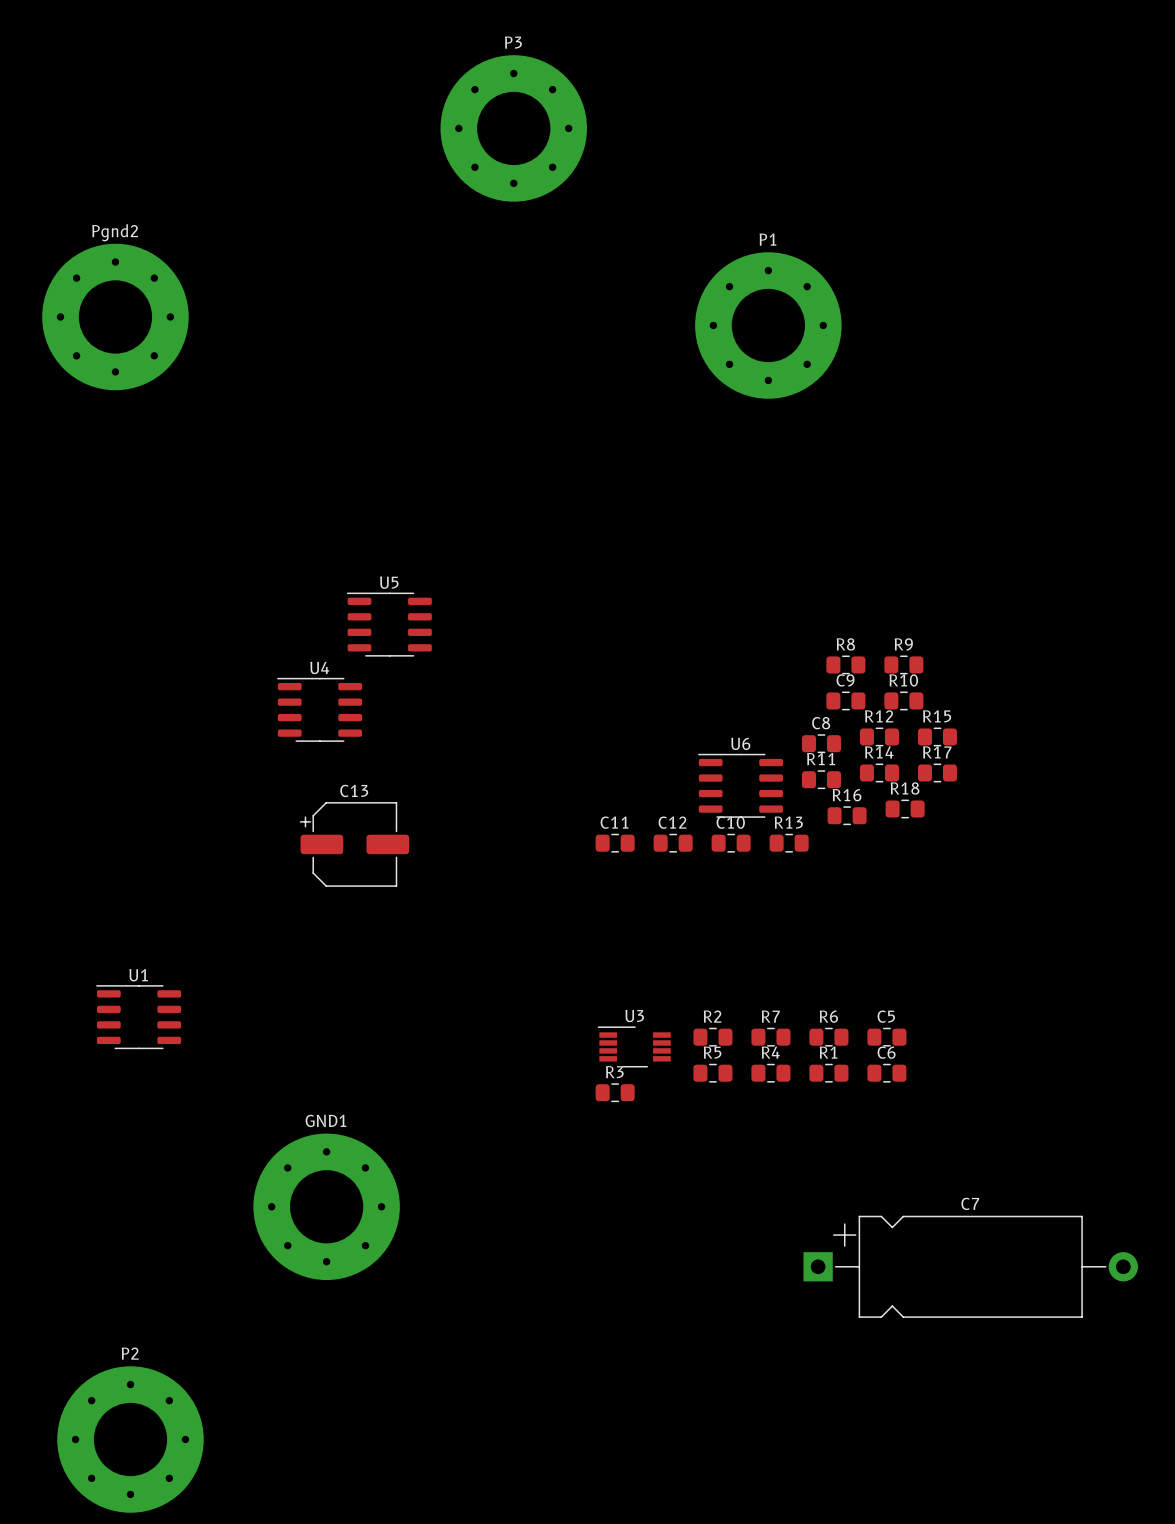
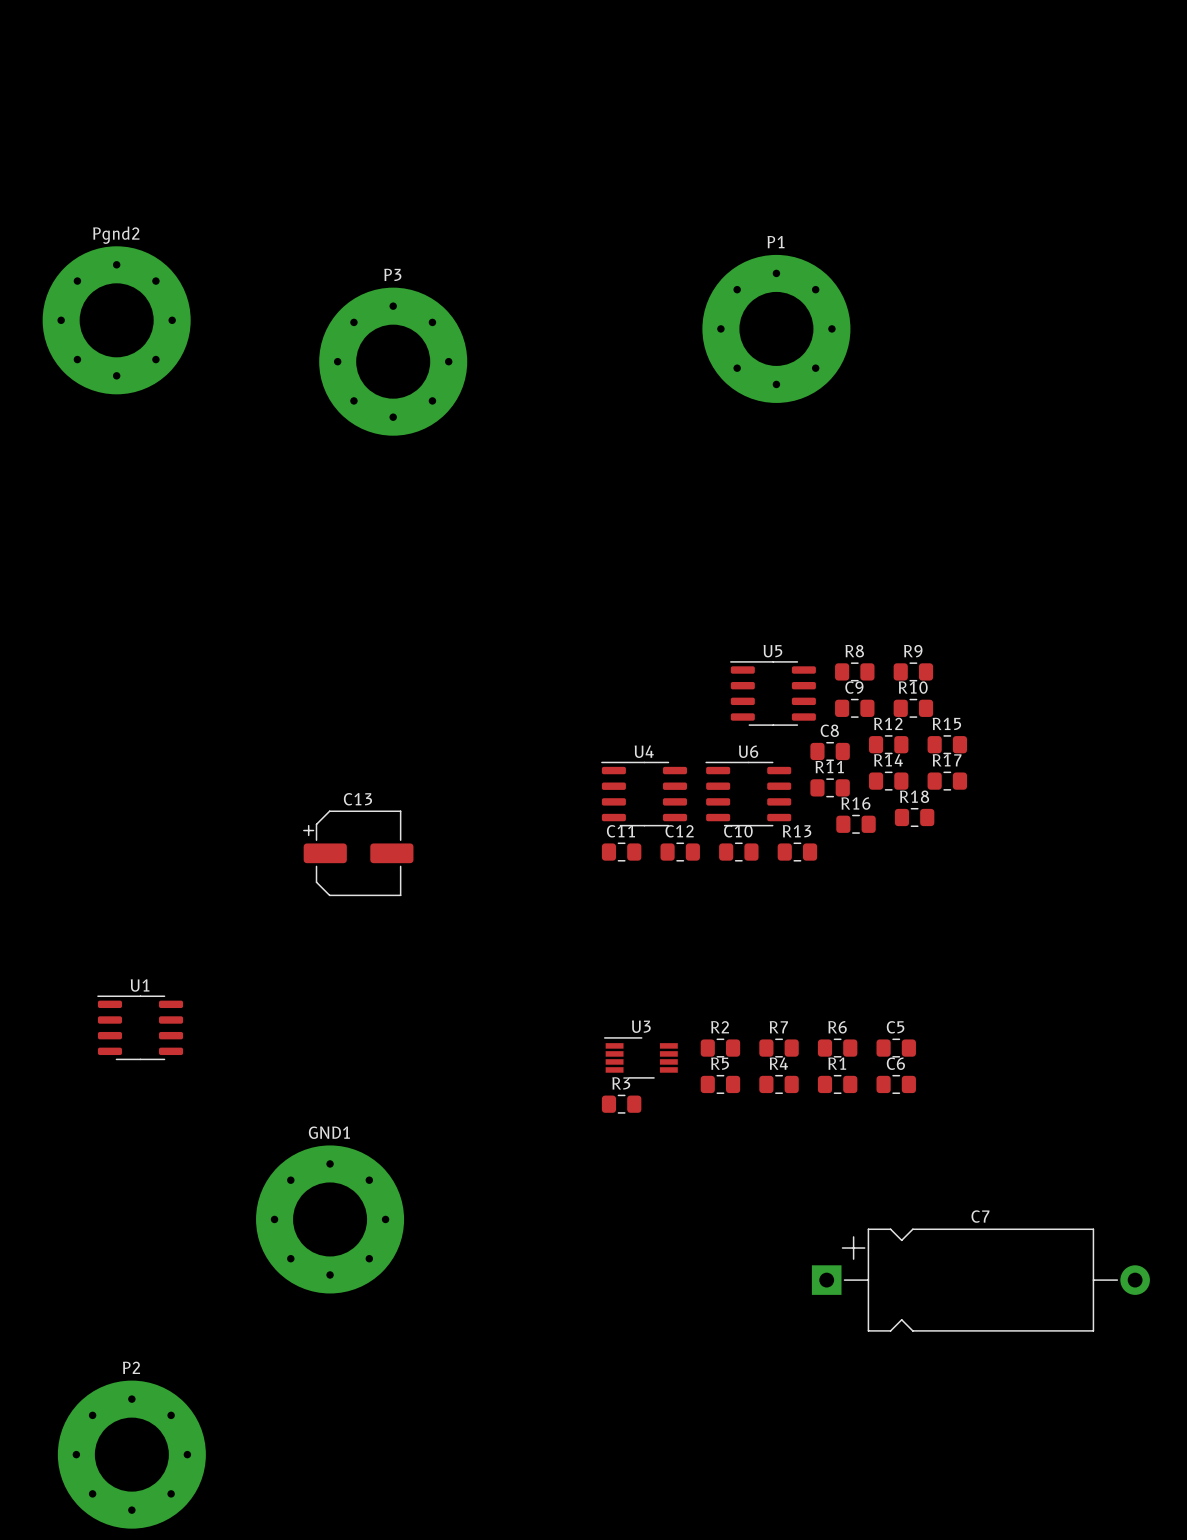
P3 position: (513, 128) -> (393, 361)
U5 position: (389, 624) -> (772, 693)
U4 position: (319, 709) -> (644, 794)

